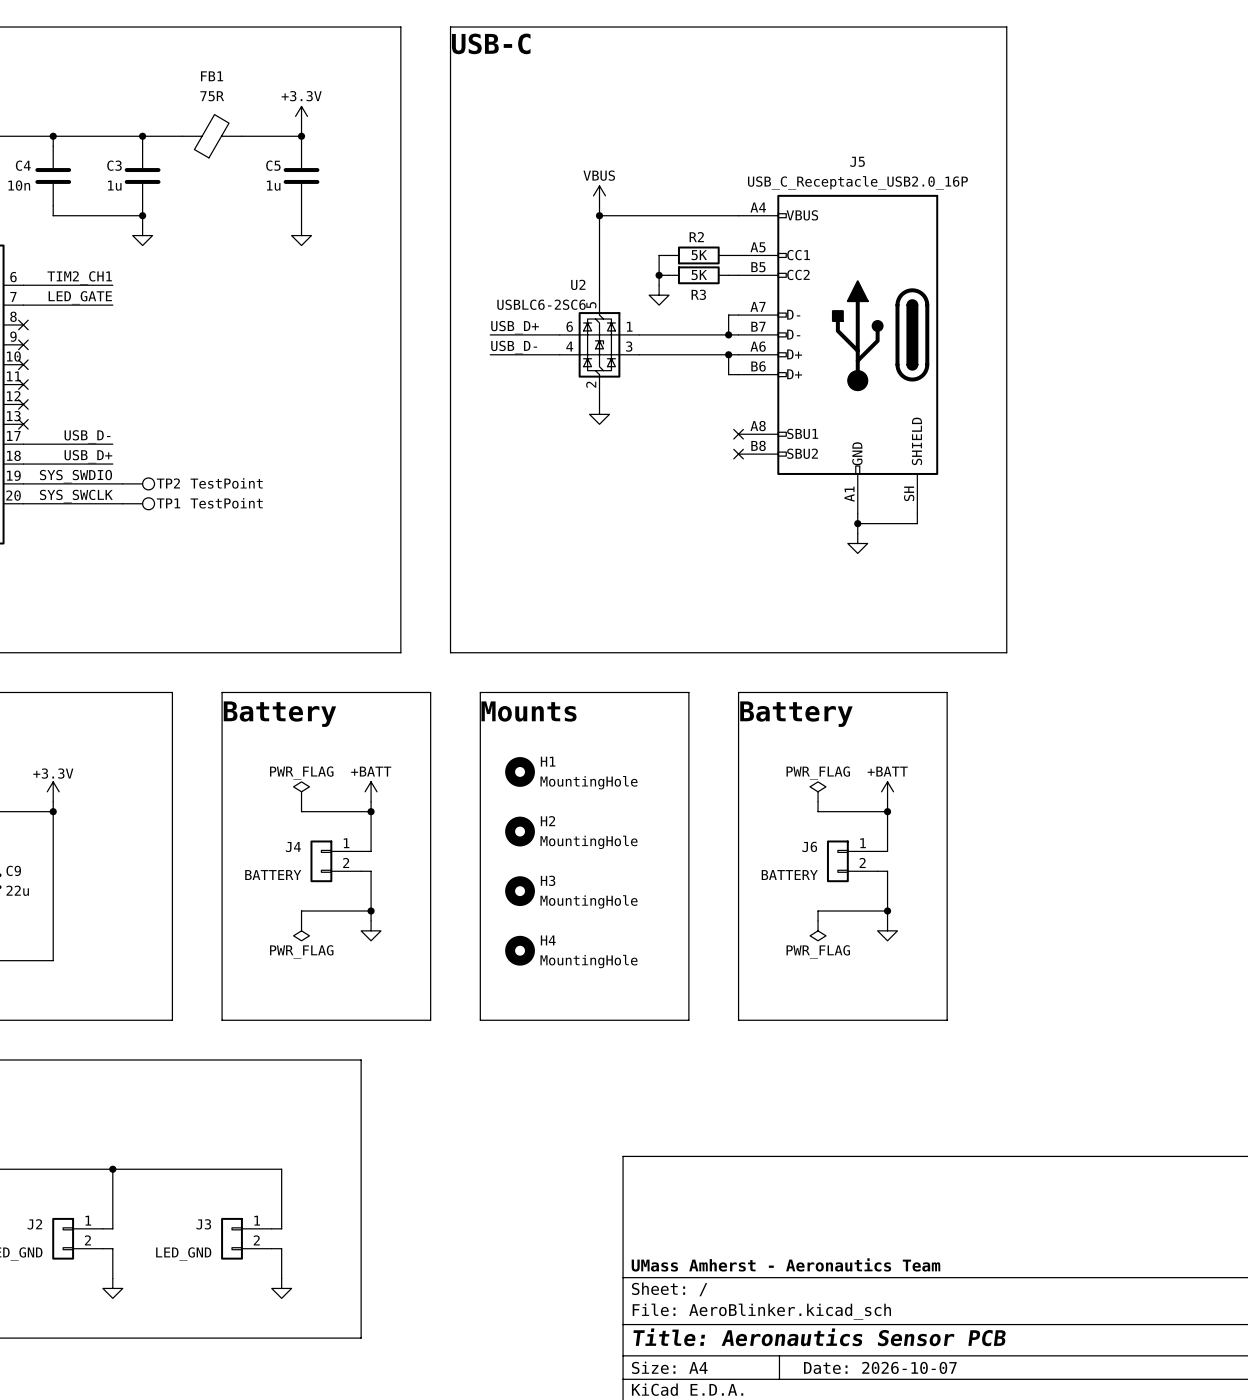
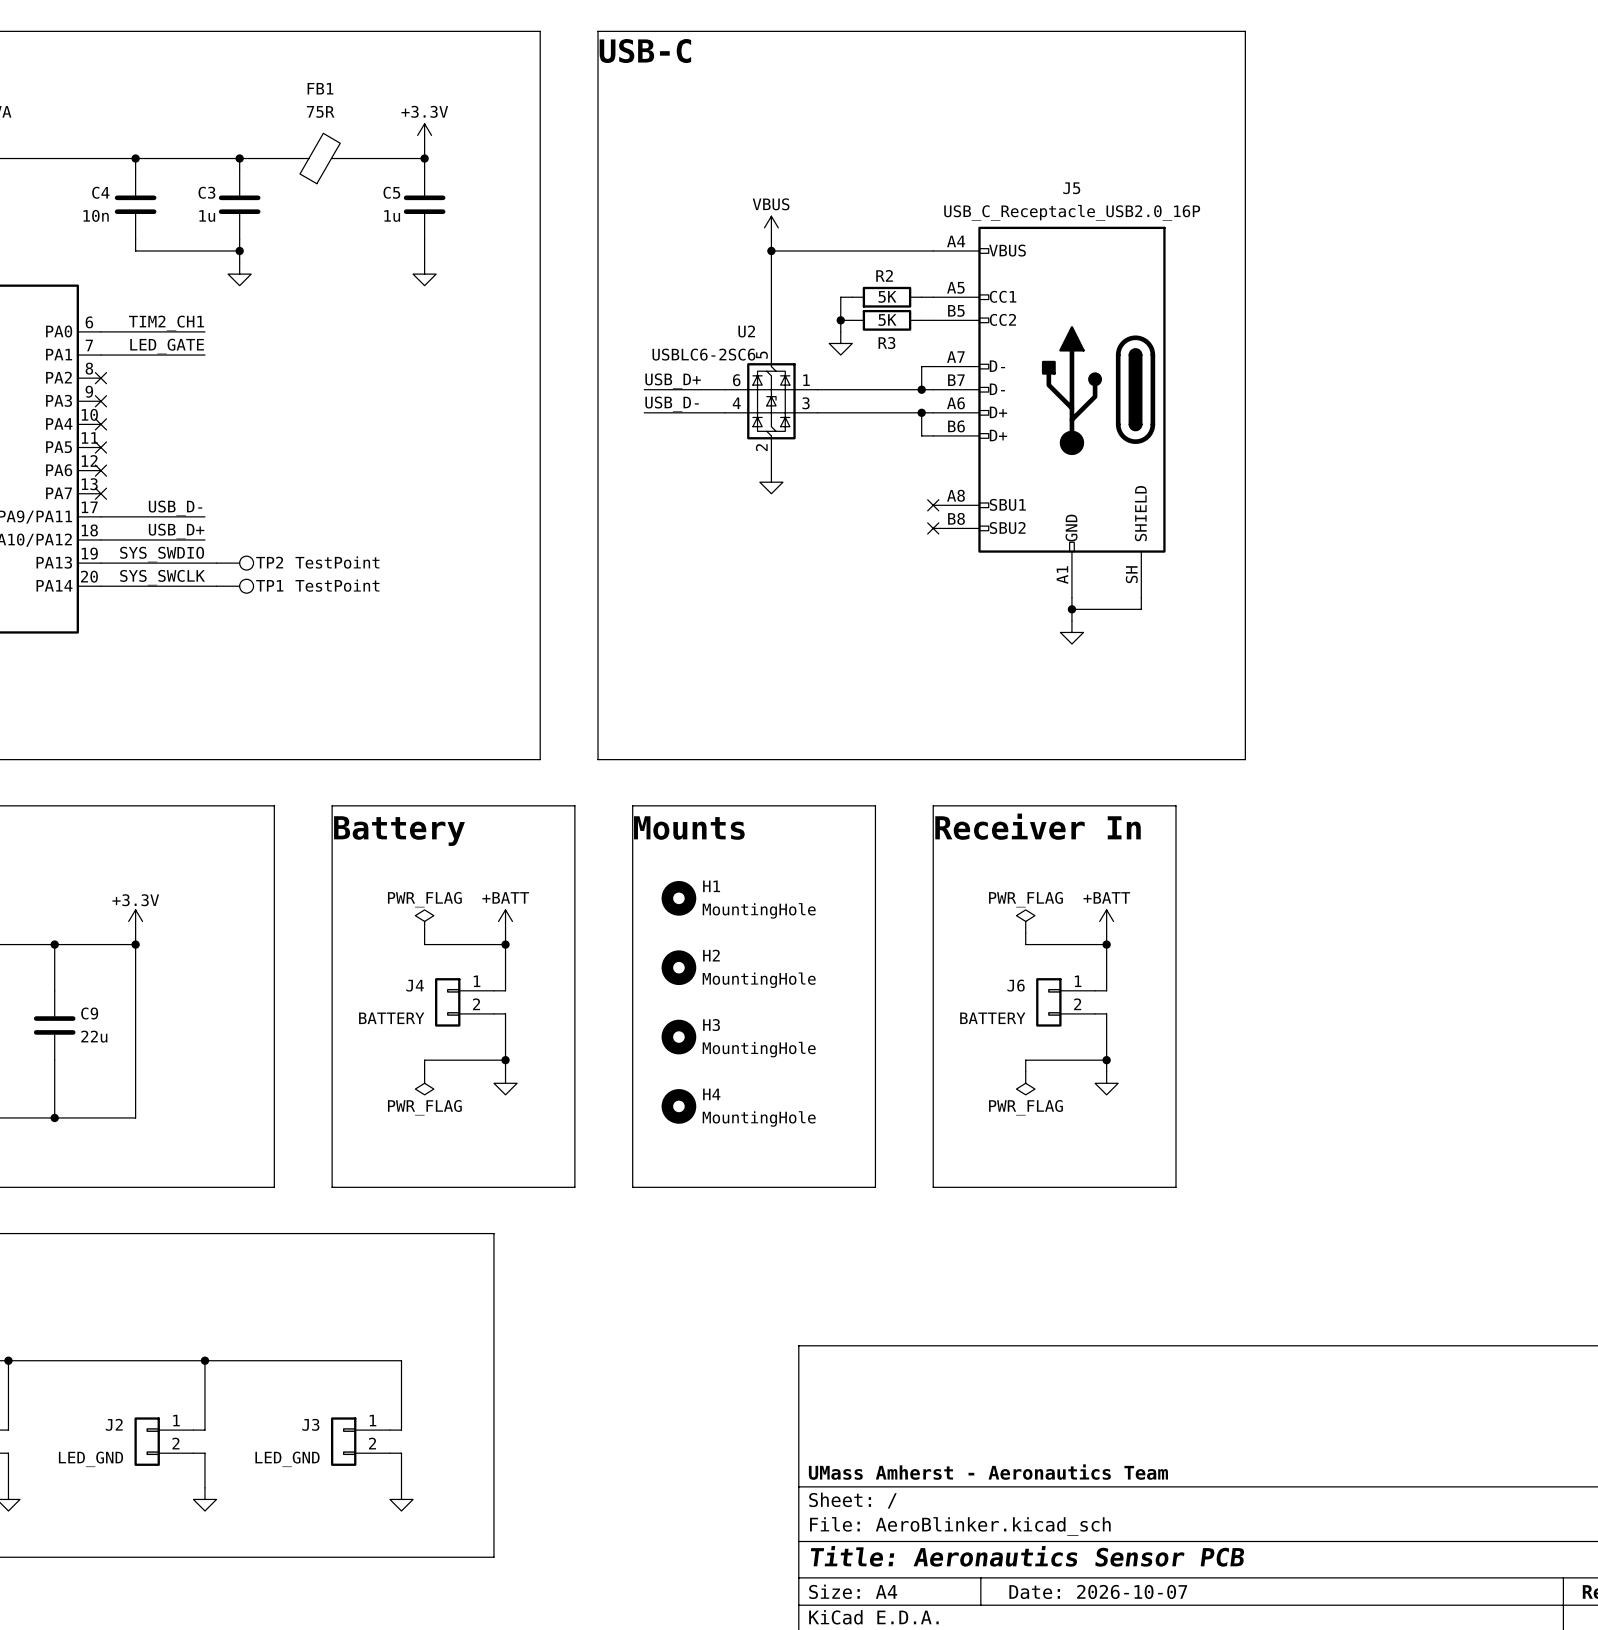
text: Battery (796, 714) -> Receiver In (1038, 826)

